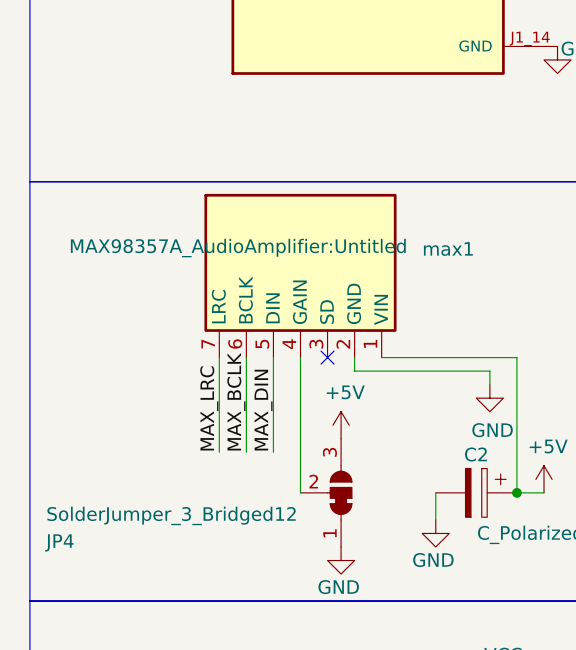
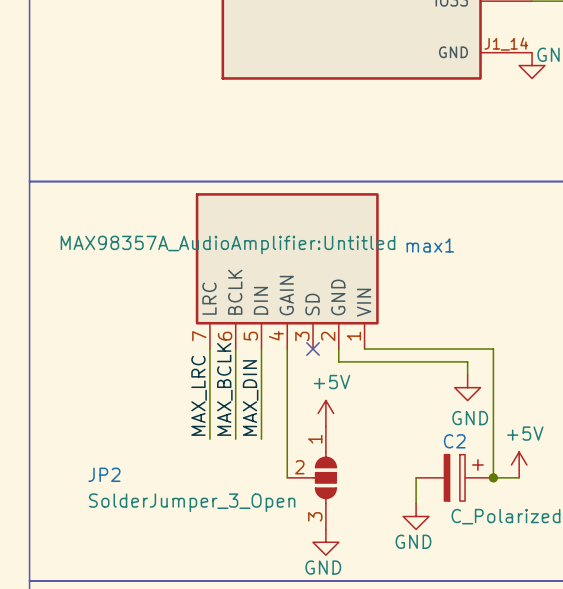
JP4: SolderJumper_3_Bridged12 (326, 492) -> none
JP2: none -> SolderJumper_3_Open (312, 477)

